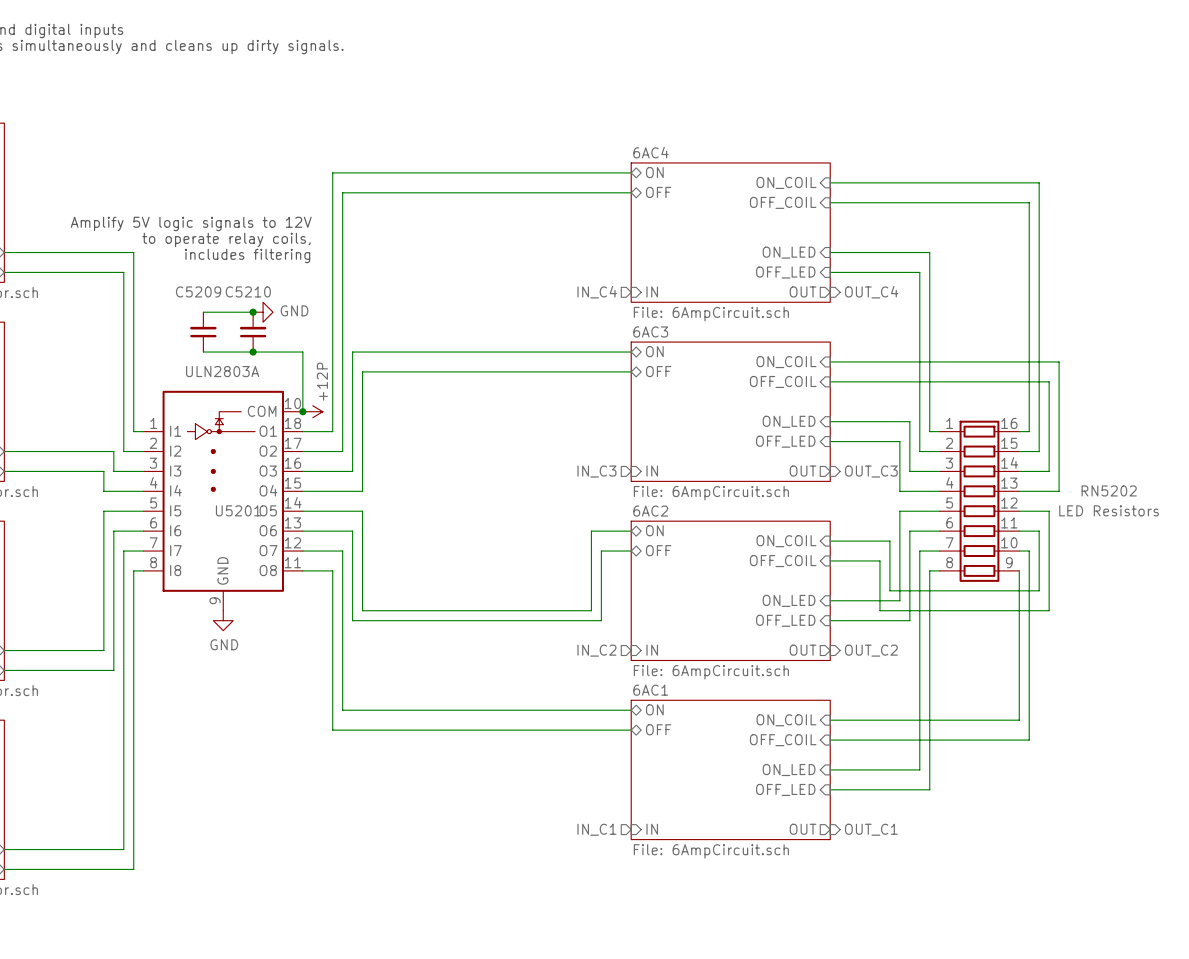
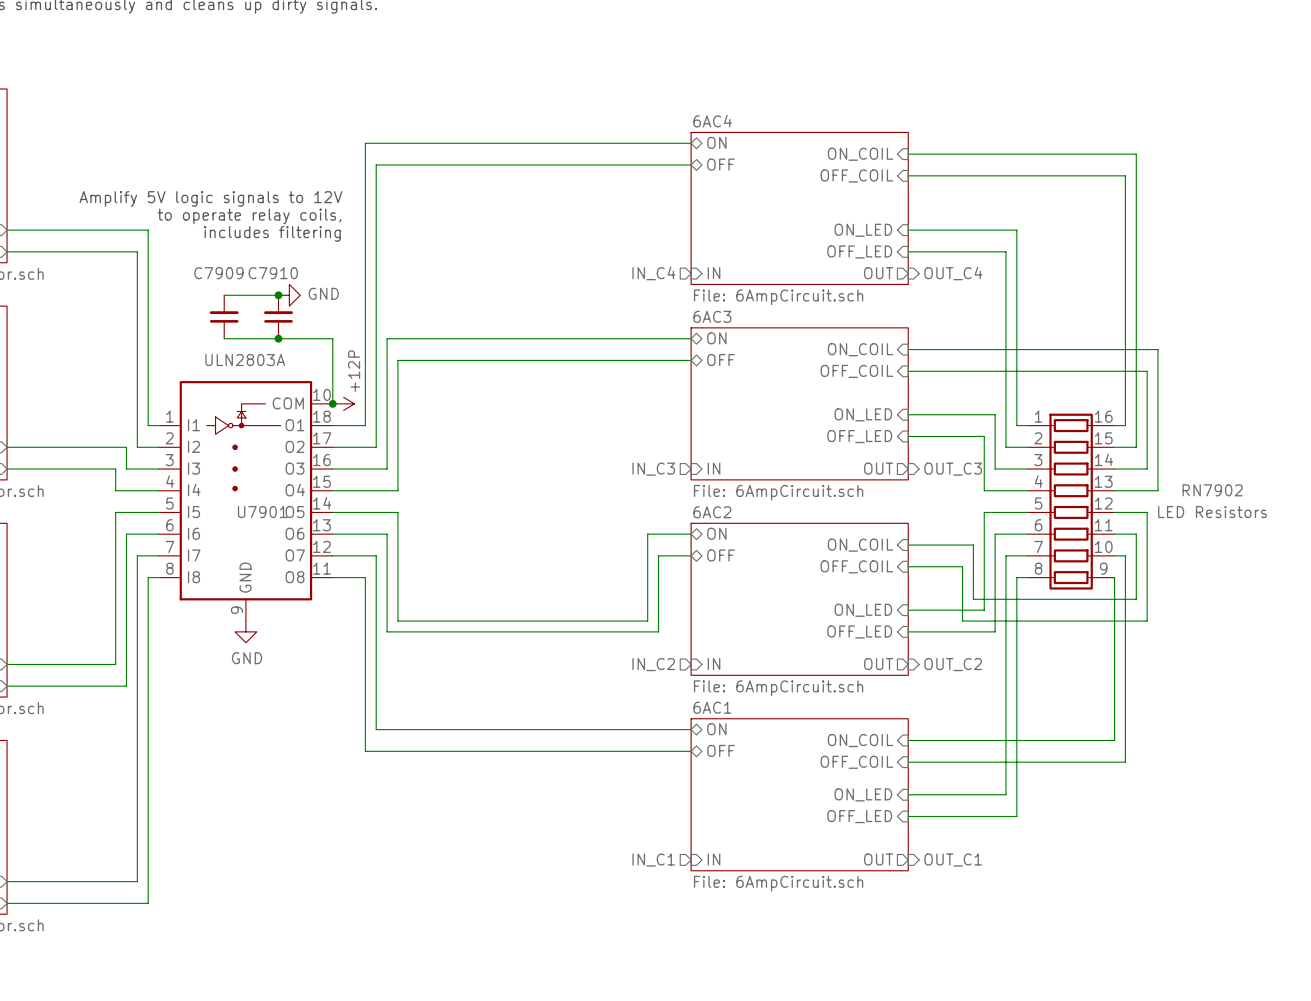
C5209 name: C5209 (198, 291) -> C7909 (218, 273)
C5210 name: C5210 (248, 291) -> C7910 (273, 273)
RN5202 name: RN5202 (1109, 490) -> RN7902 (1212, 490)
U5201 name: U5201 (238, 510) -> U7901 (262, 512)

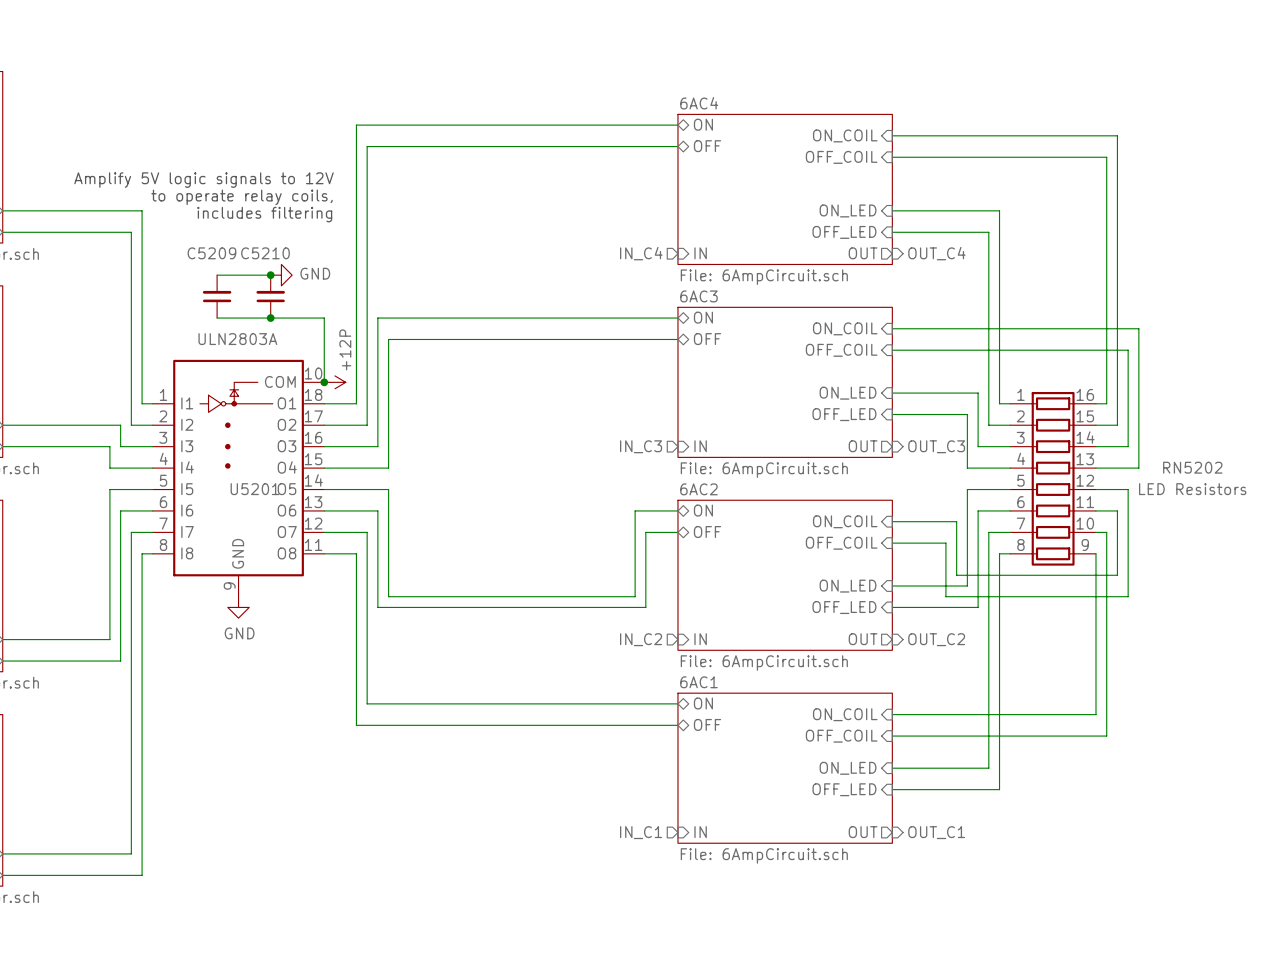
C7909 name: C7909 (218, 273) -> C5209 (211, 253)
C7910 name: C7910 (273, 273) -> C5210 (265, 253)
RN7902 name: RN7902 (1212, 490) -> RN5202 (1192, 467)
U7901 name: U7901 (262, 512) -> U5201 (254, 489)

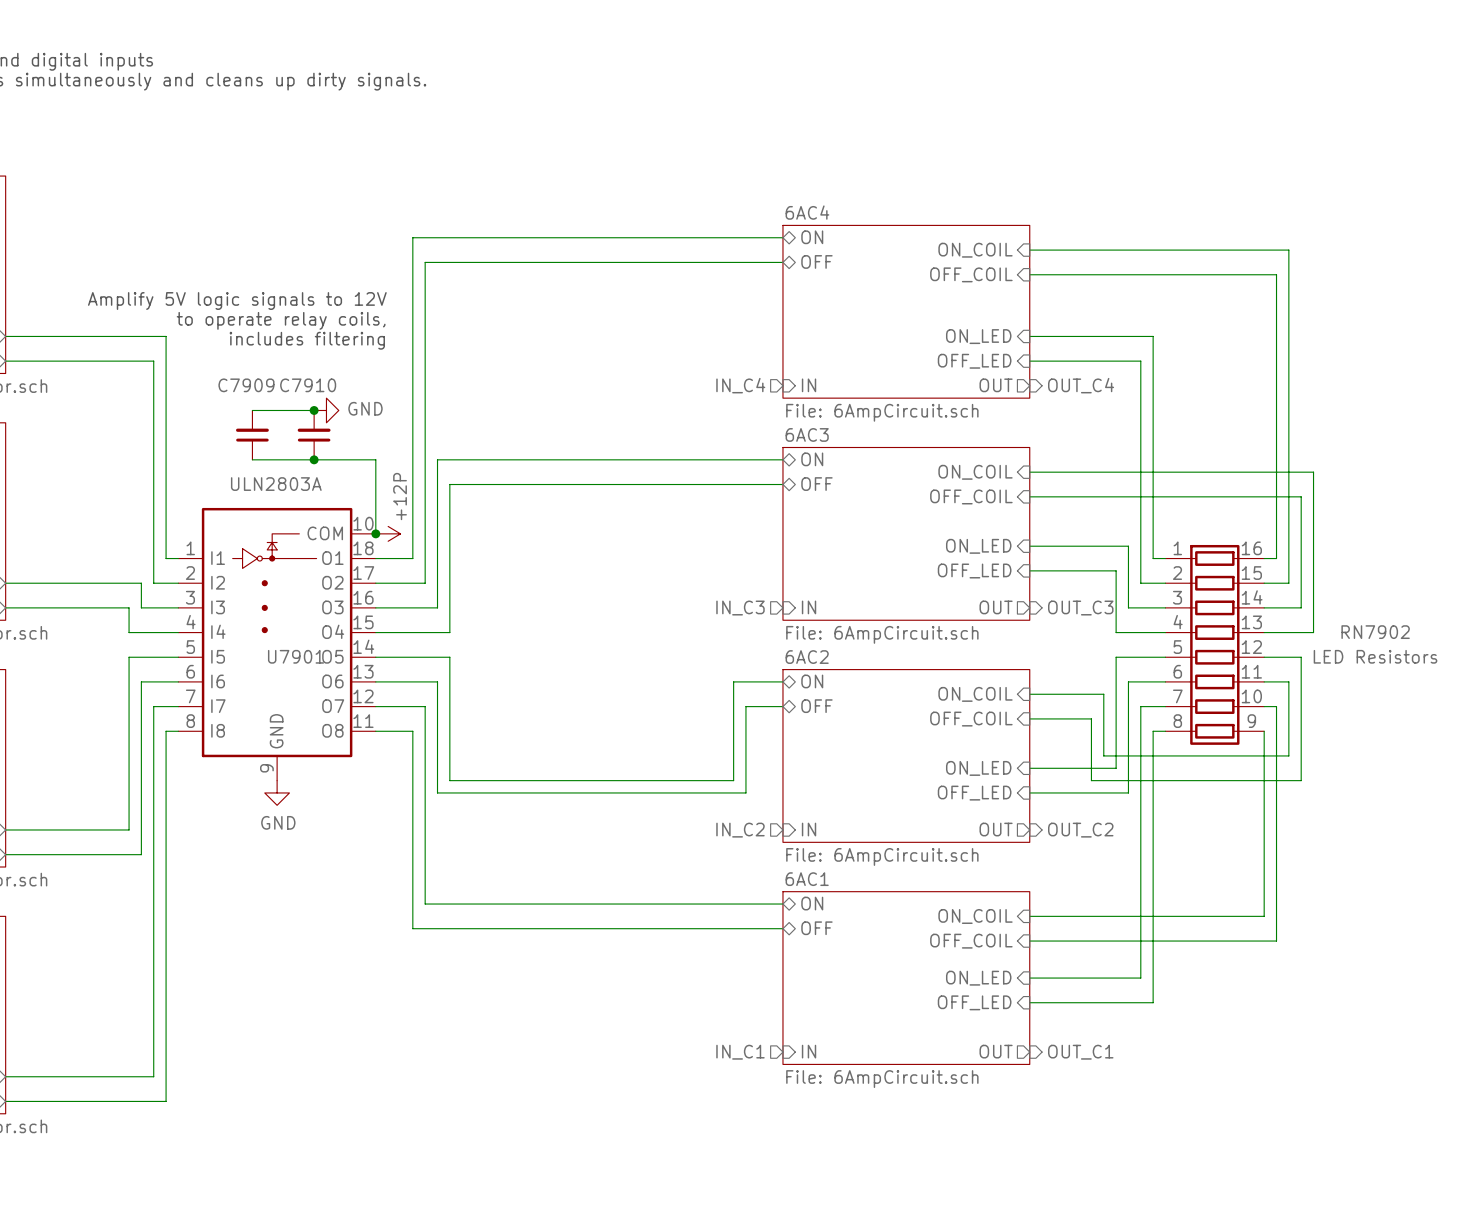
C5209 name: C5209 (211, 253) -> C7909 (246, 385)
C5210 name: C5210 (265, 253) -> C7910 (308, 385)
RN5202 name: RN5202 (1192, 467) -> RN7902 (1375, 632)
U5201 name: U5201 (254, 489) -> U7901 (296, 656)

